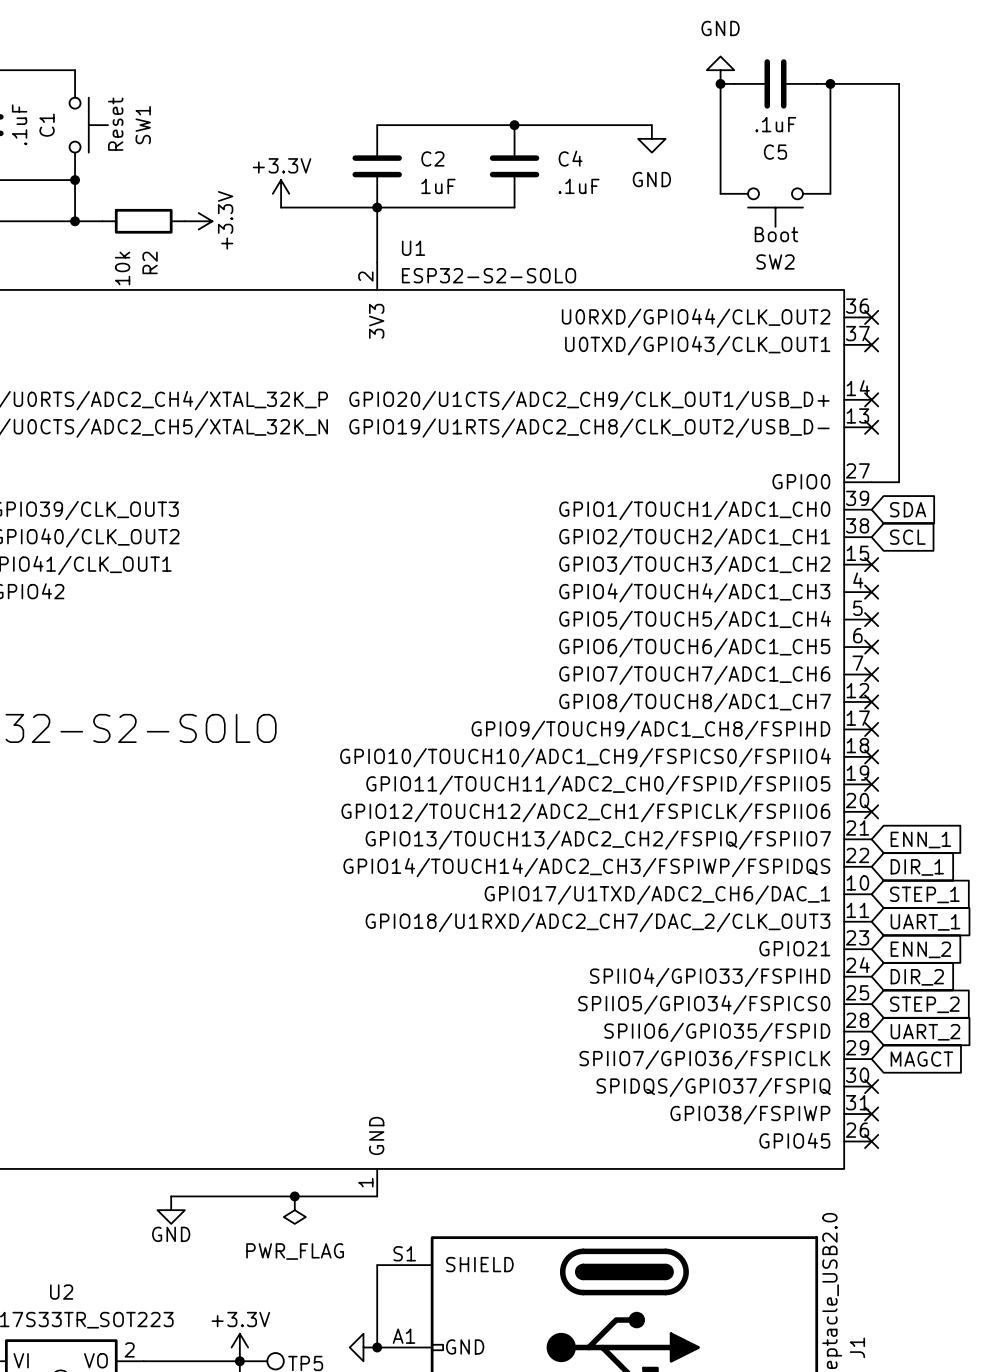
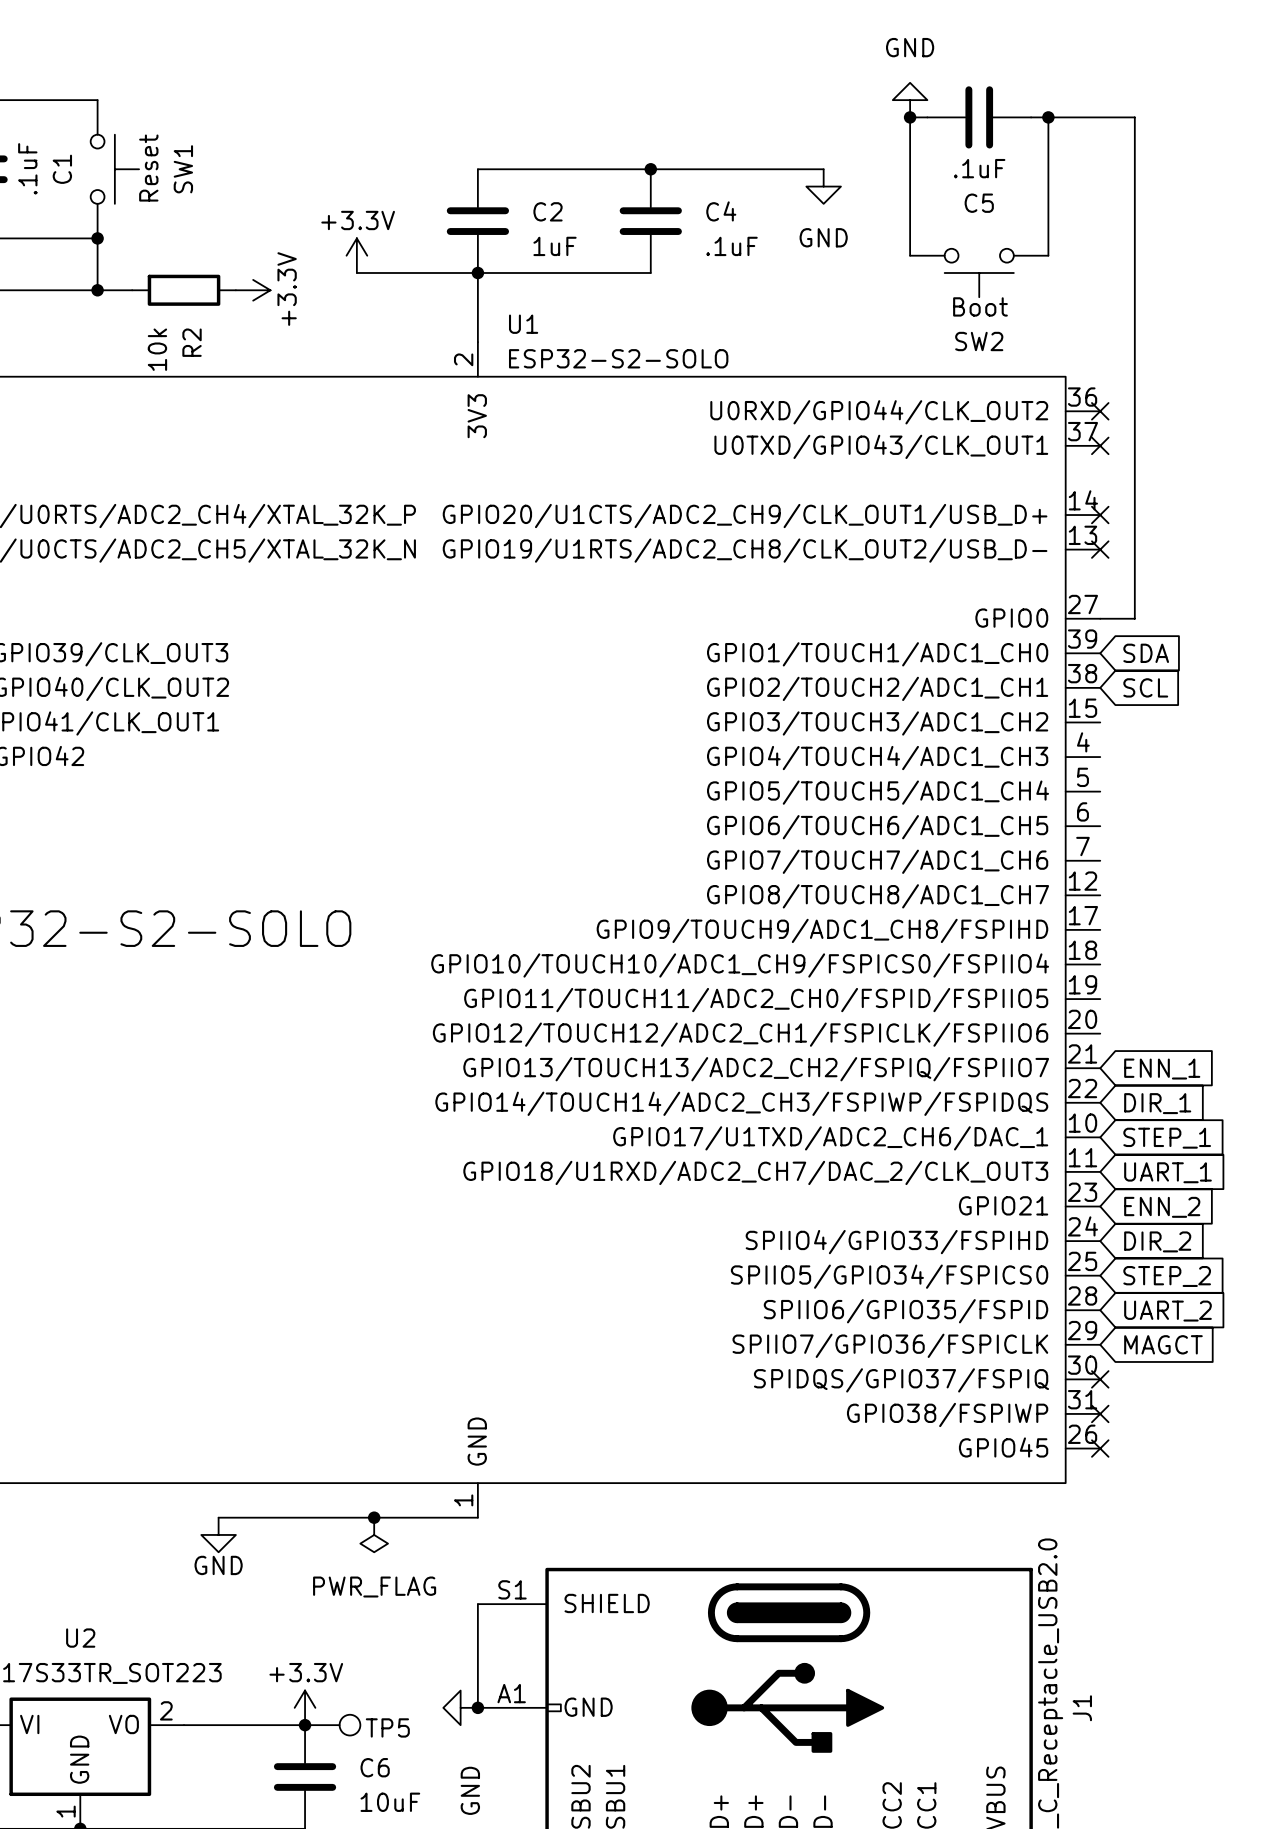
no-connect mark: (871, 564) -> none
no-connect mark: (871, 592) -> none
no-connect mark: (871, 619) -> none
no-connect mark: (871, 647) -> none
no-connect mark: (871, 674) -> none
no-connect mark: (871, 701) -> none
no-connect mark: (871, 729) -> none
no-connect mark: (871, 756) -> none
no-connect mark: (871, 784) -> none
no-connect mark: (871, 811) -> none

